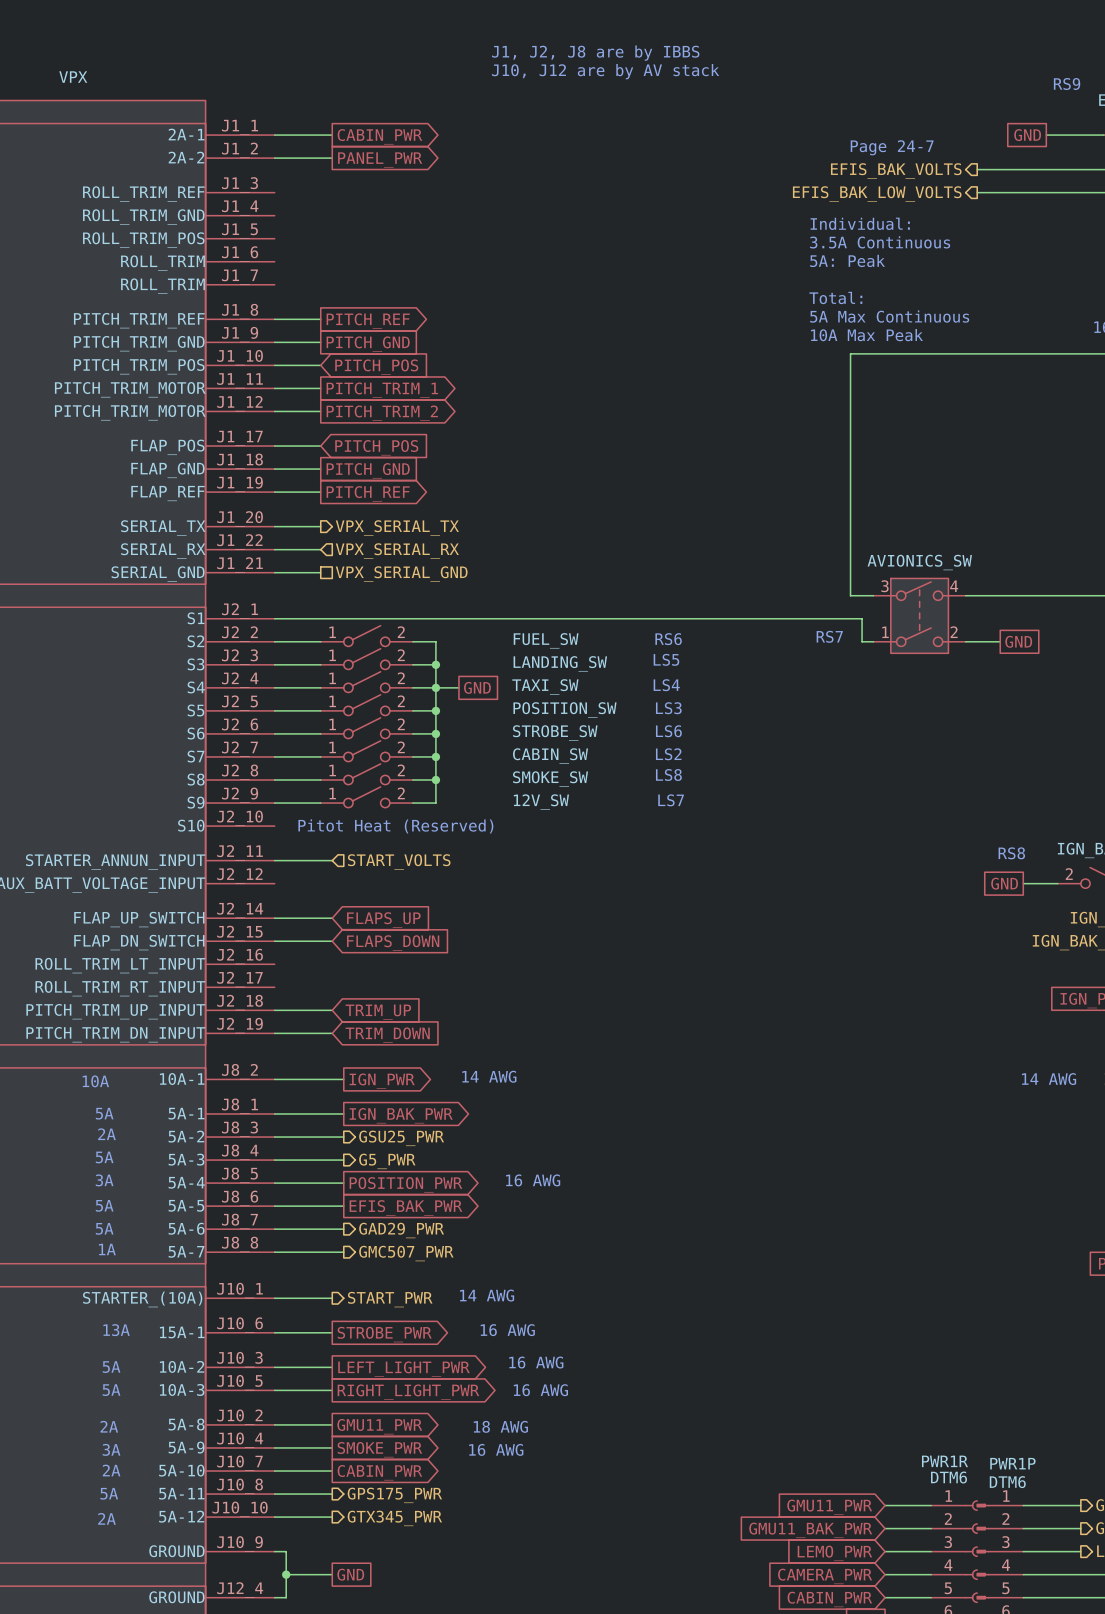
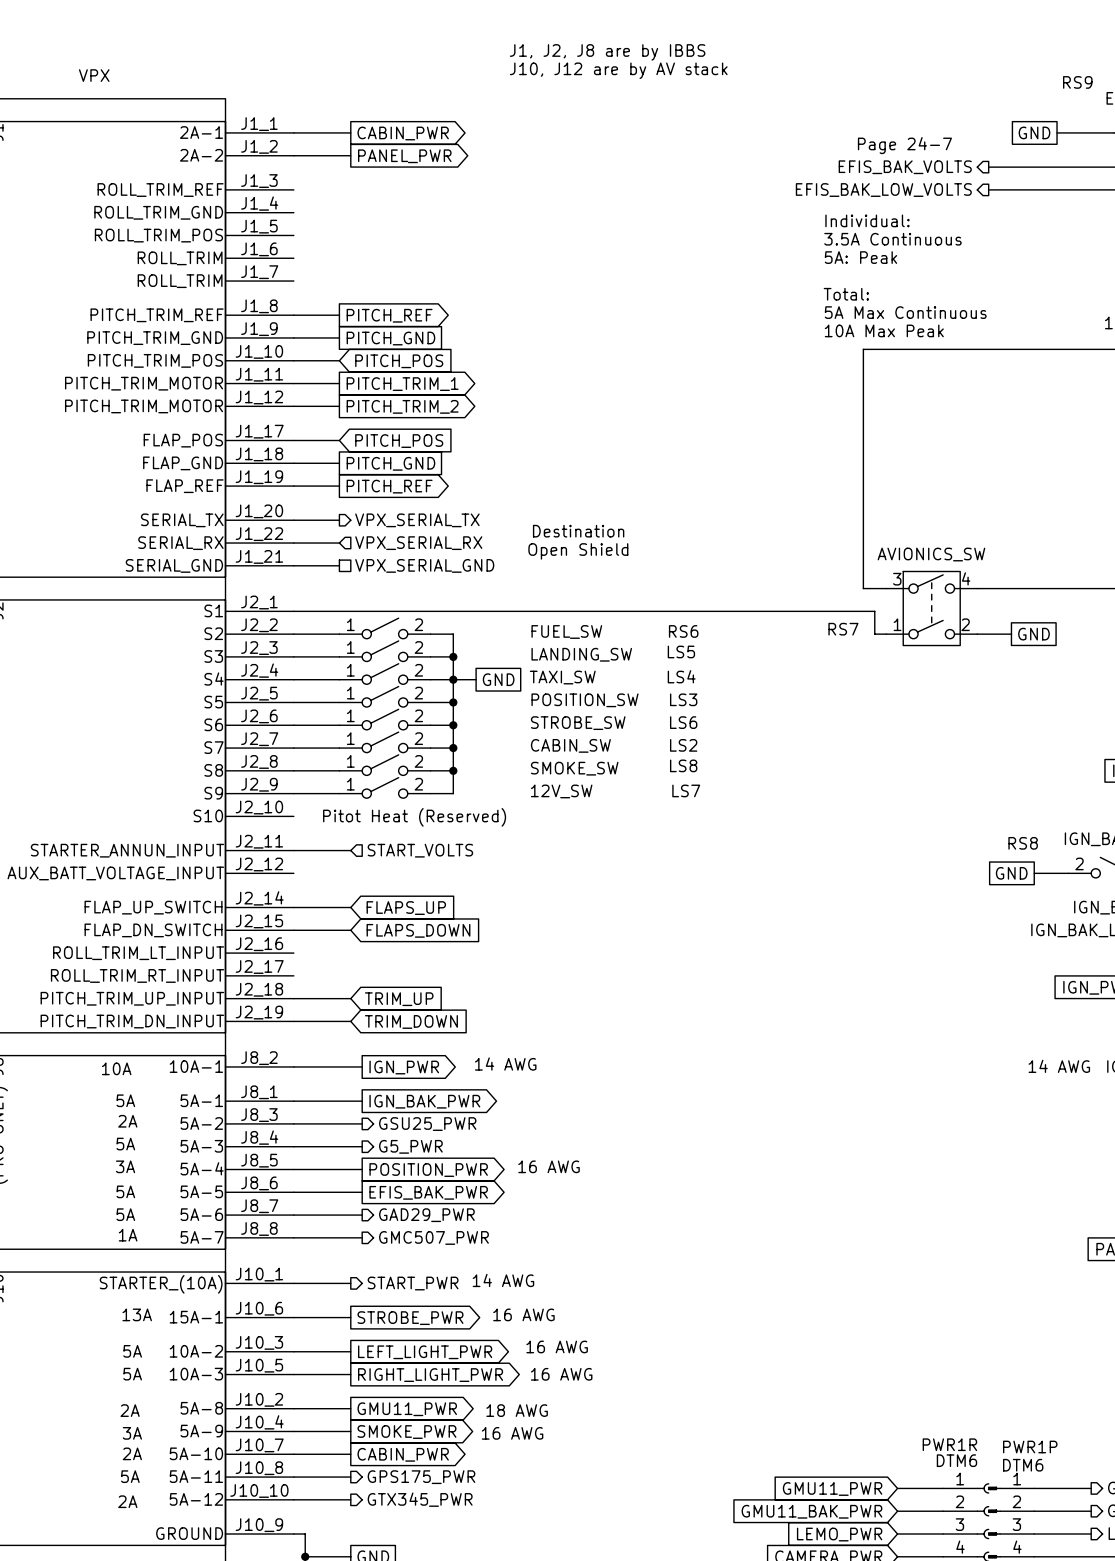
text: none -> Destination (578, 531)
text: none -> Open Shield (578, 551)

